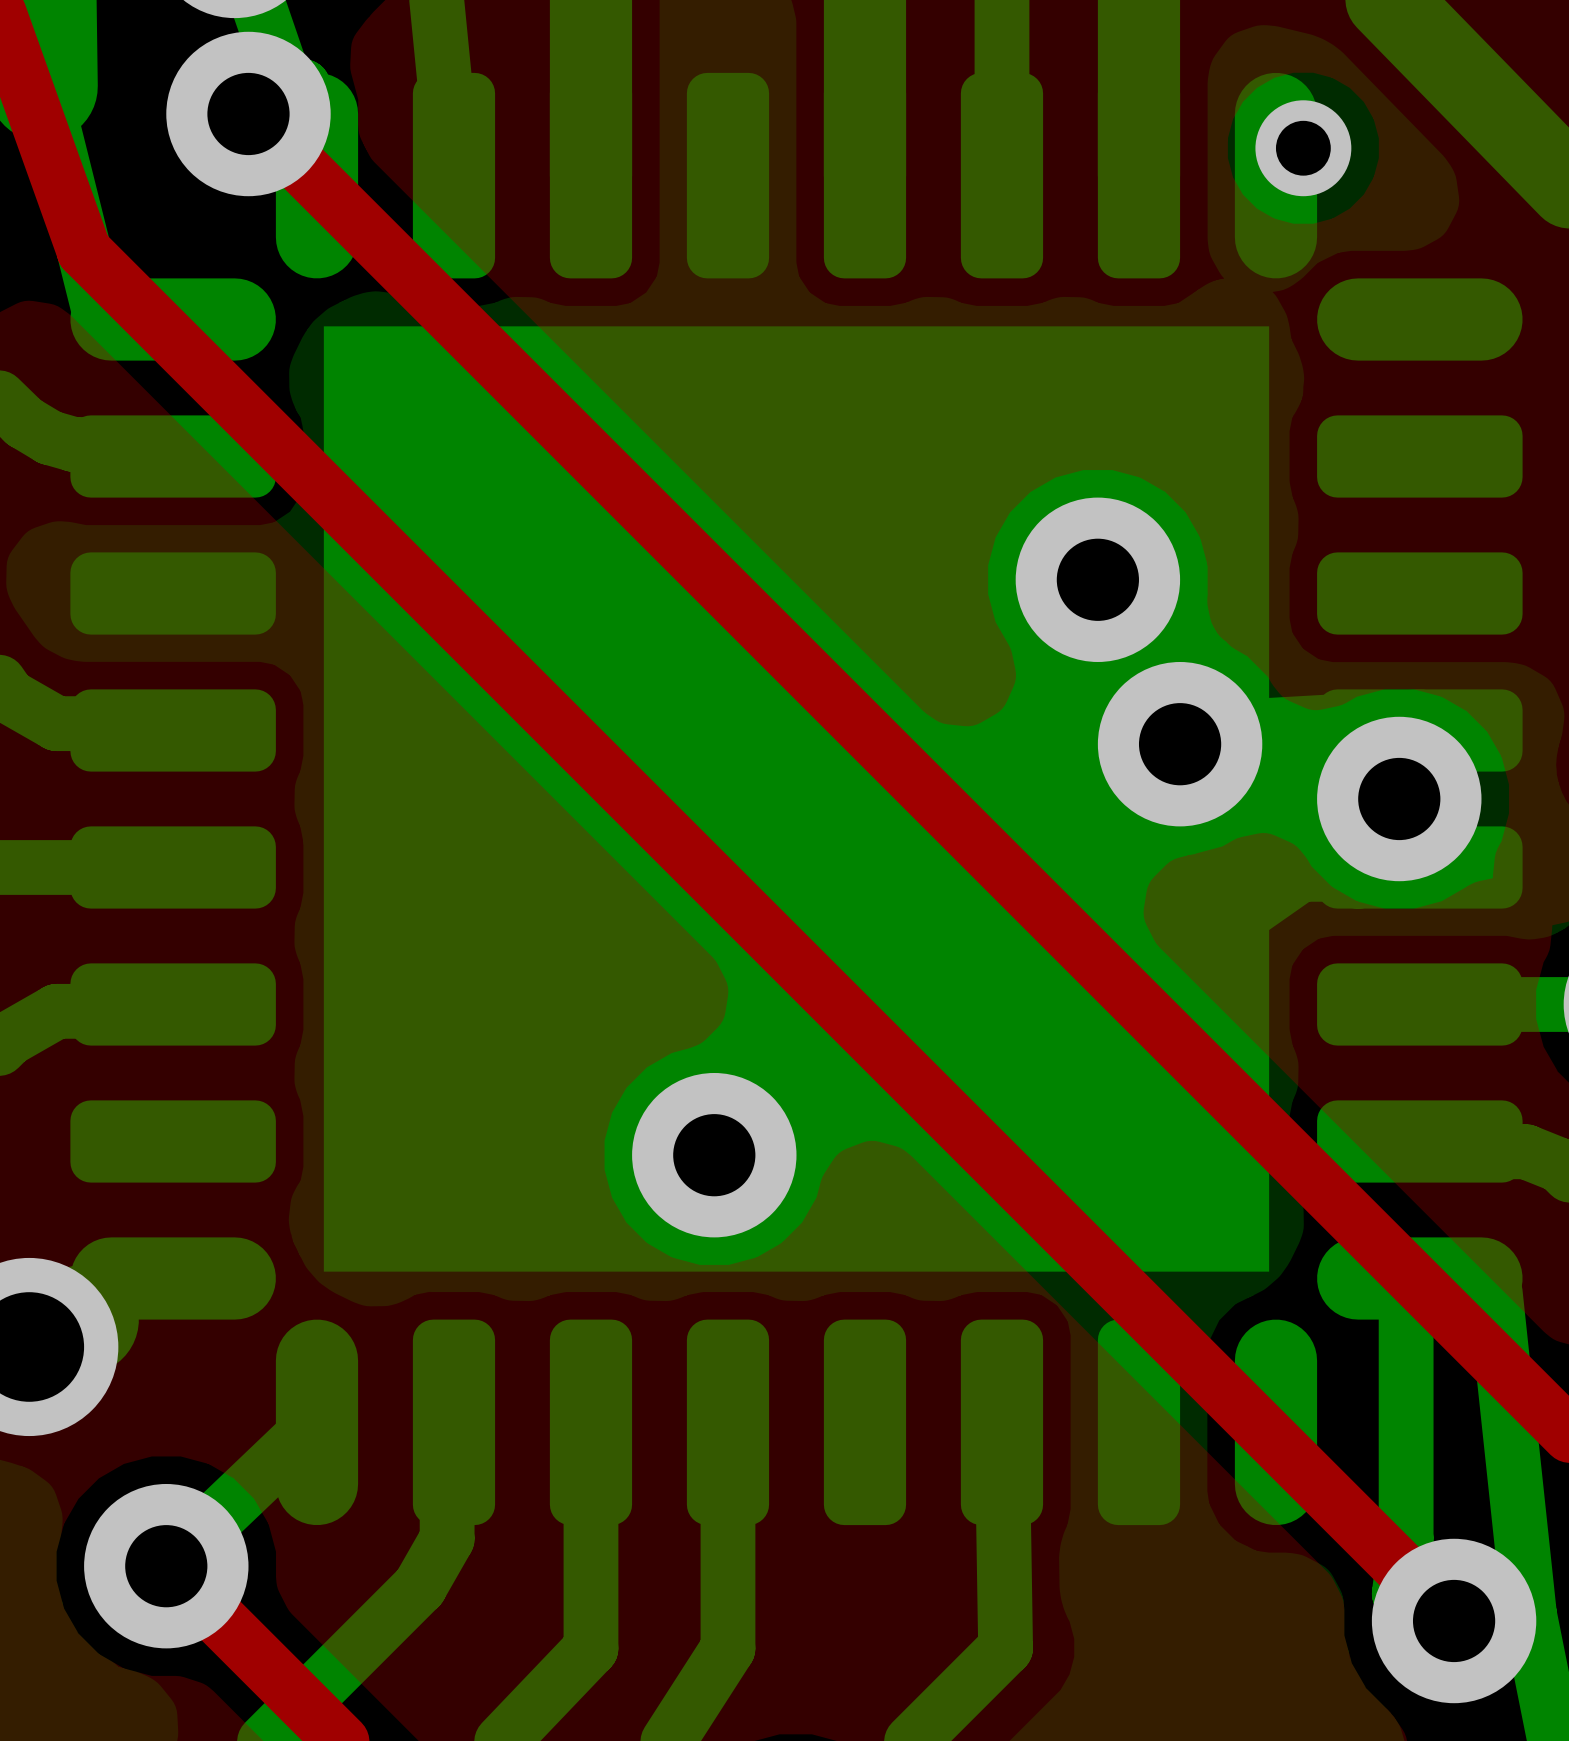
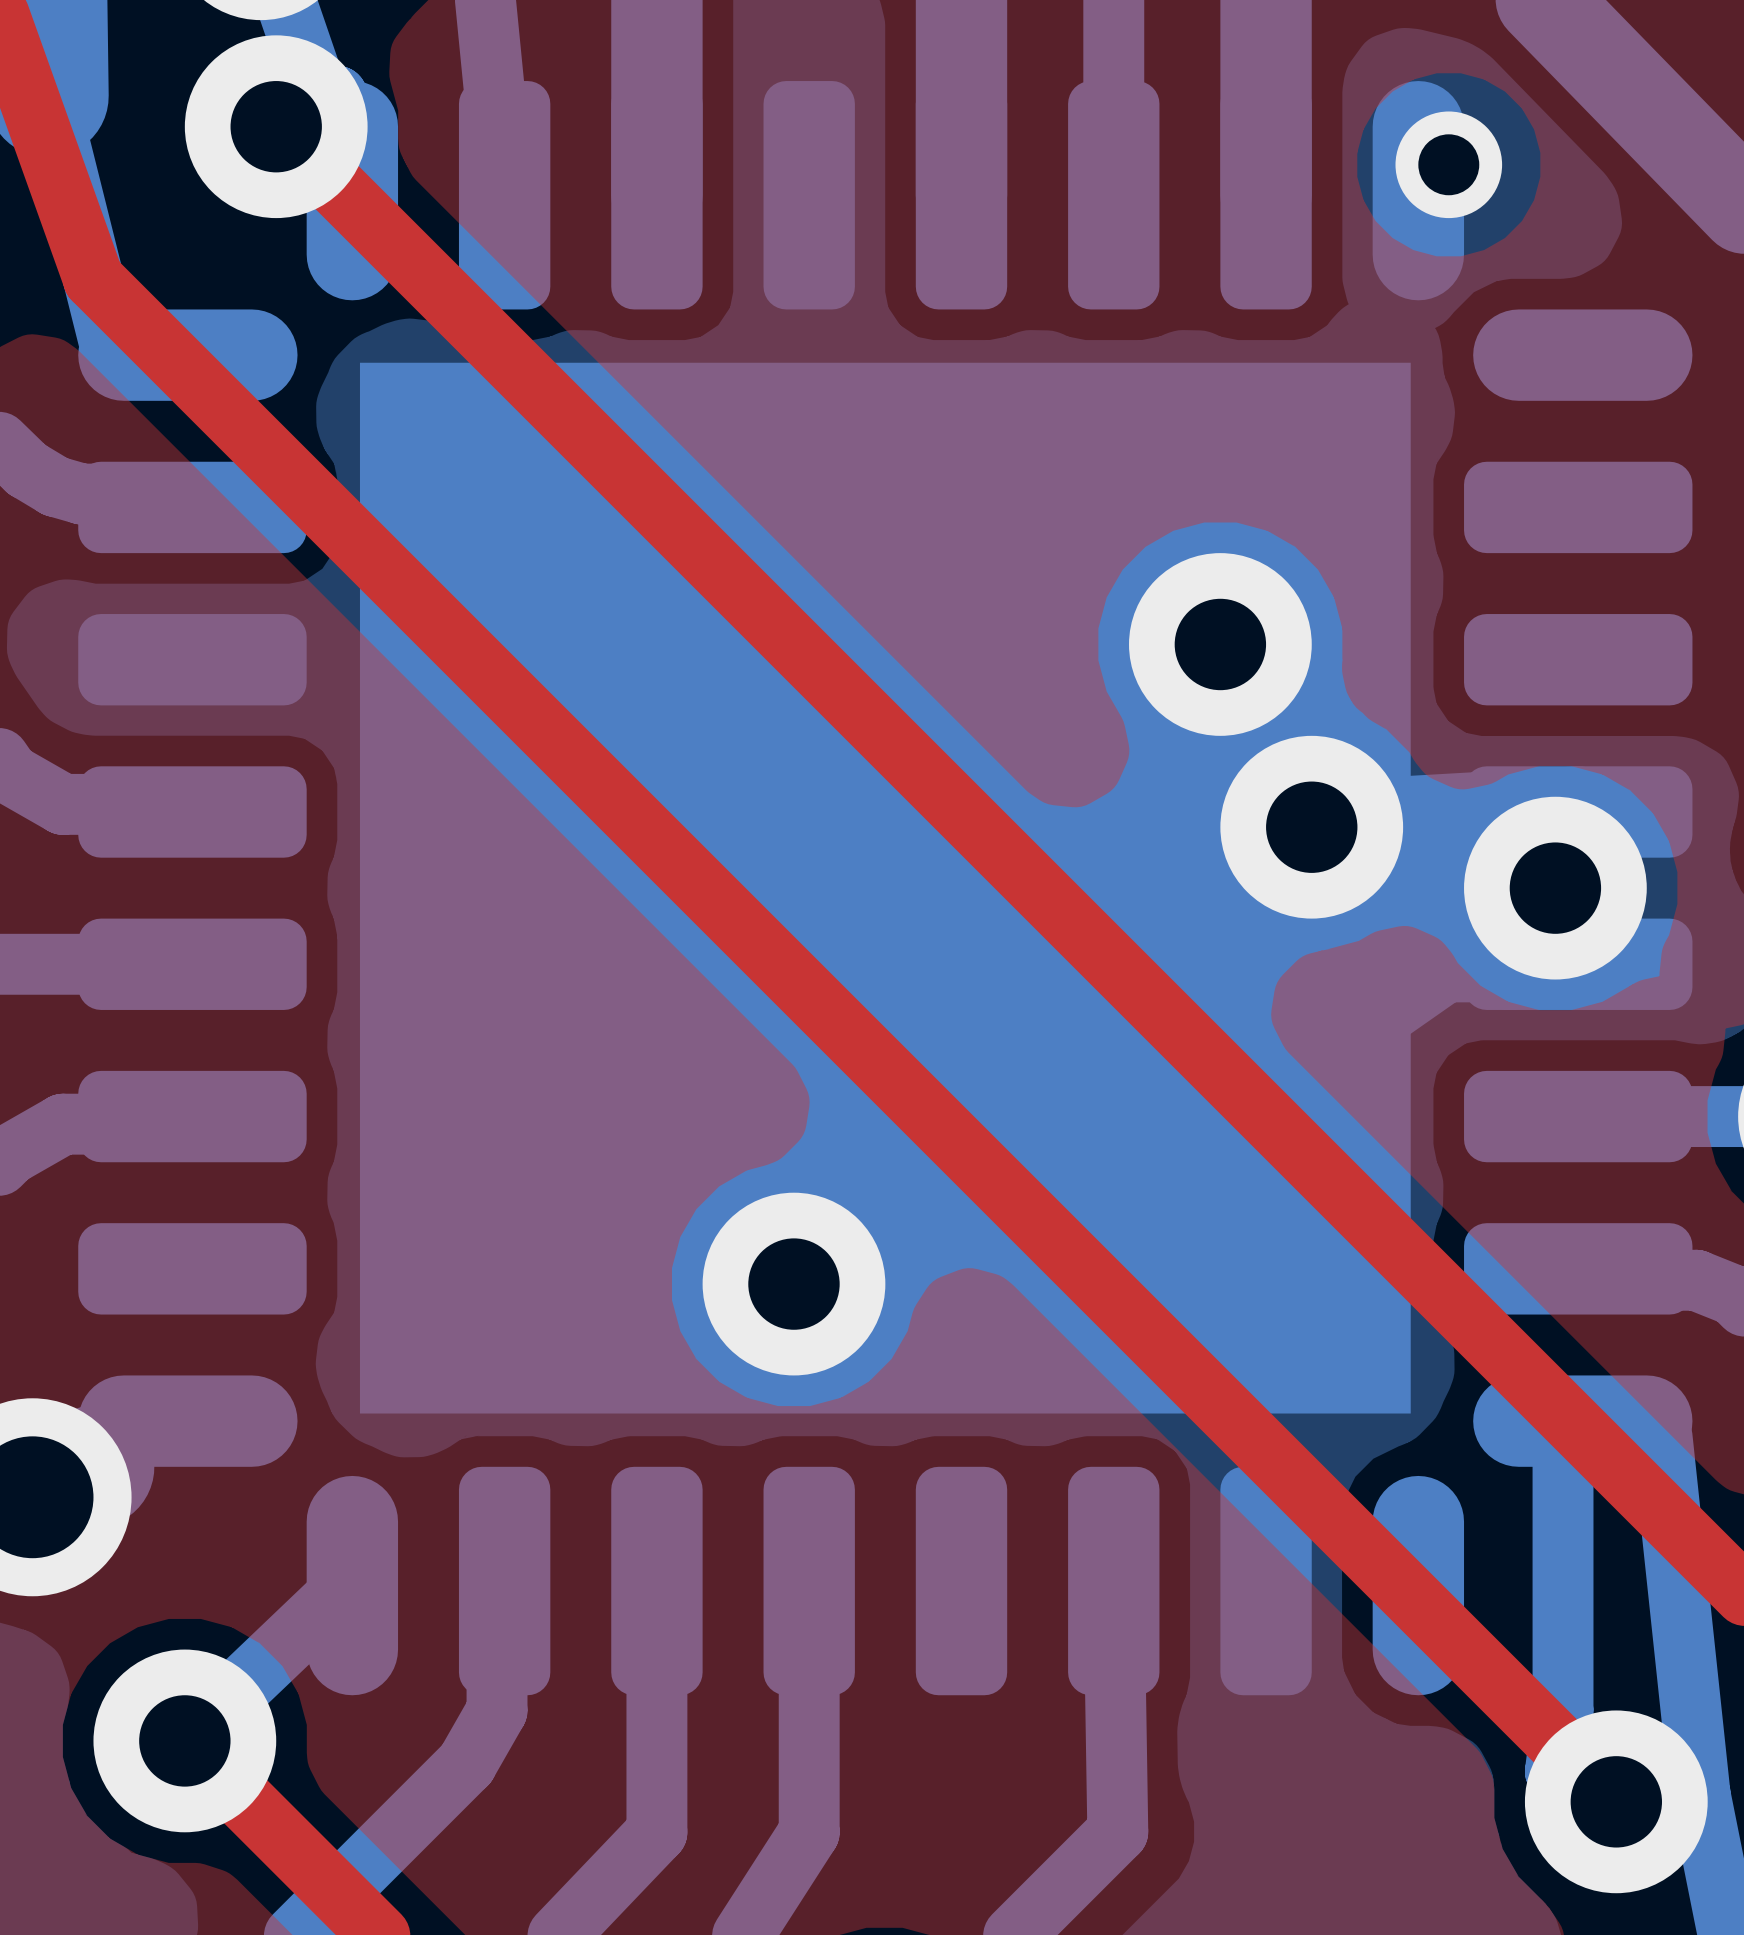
part footprint: [70, 72, 1523, 1526] -> [78, 81, 1693, 1696]

